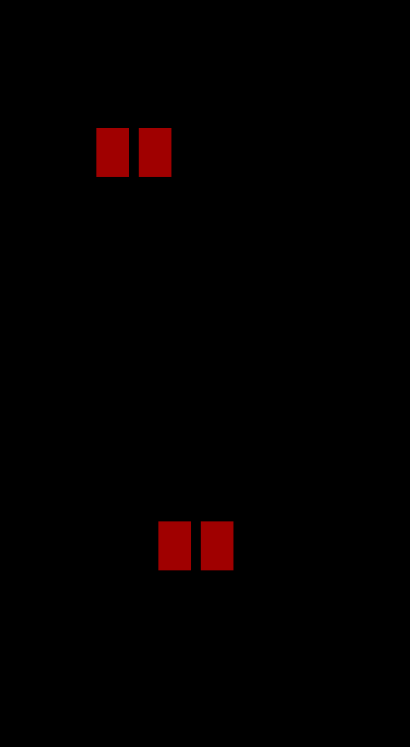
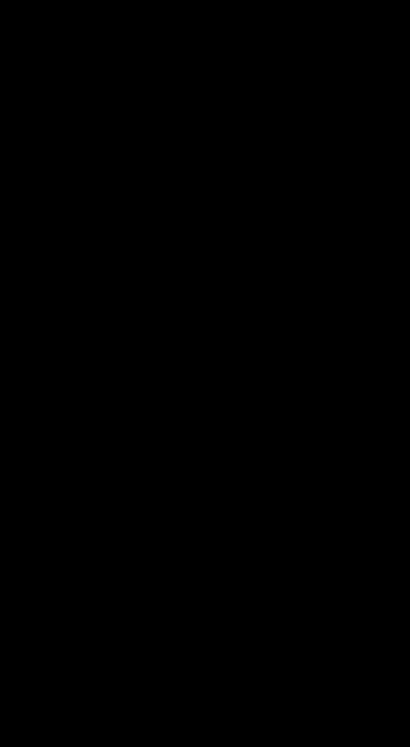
part: (133, 152) -> none
part: (195, 545) -> none

